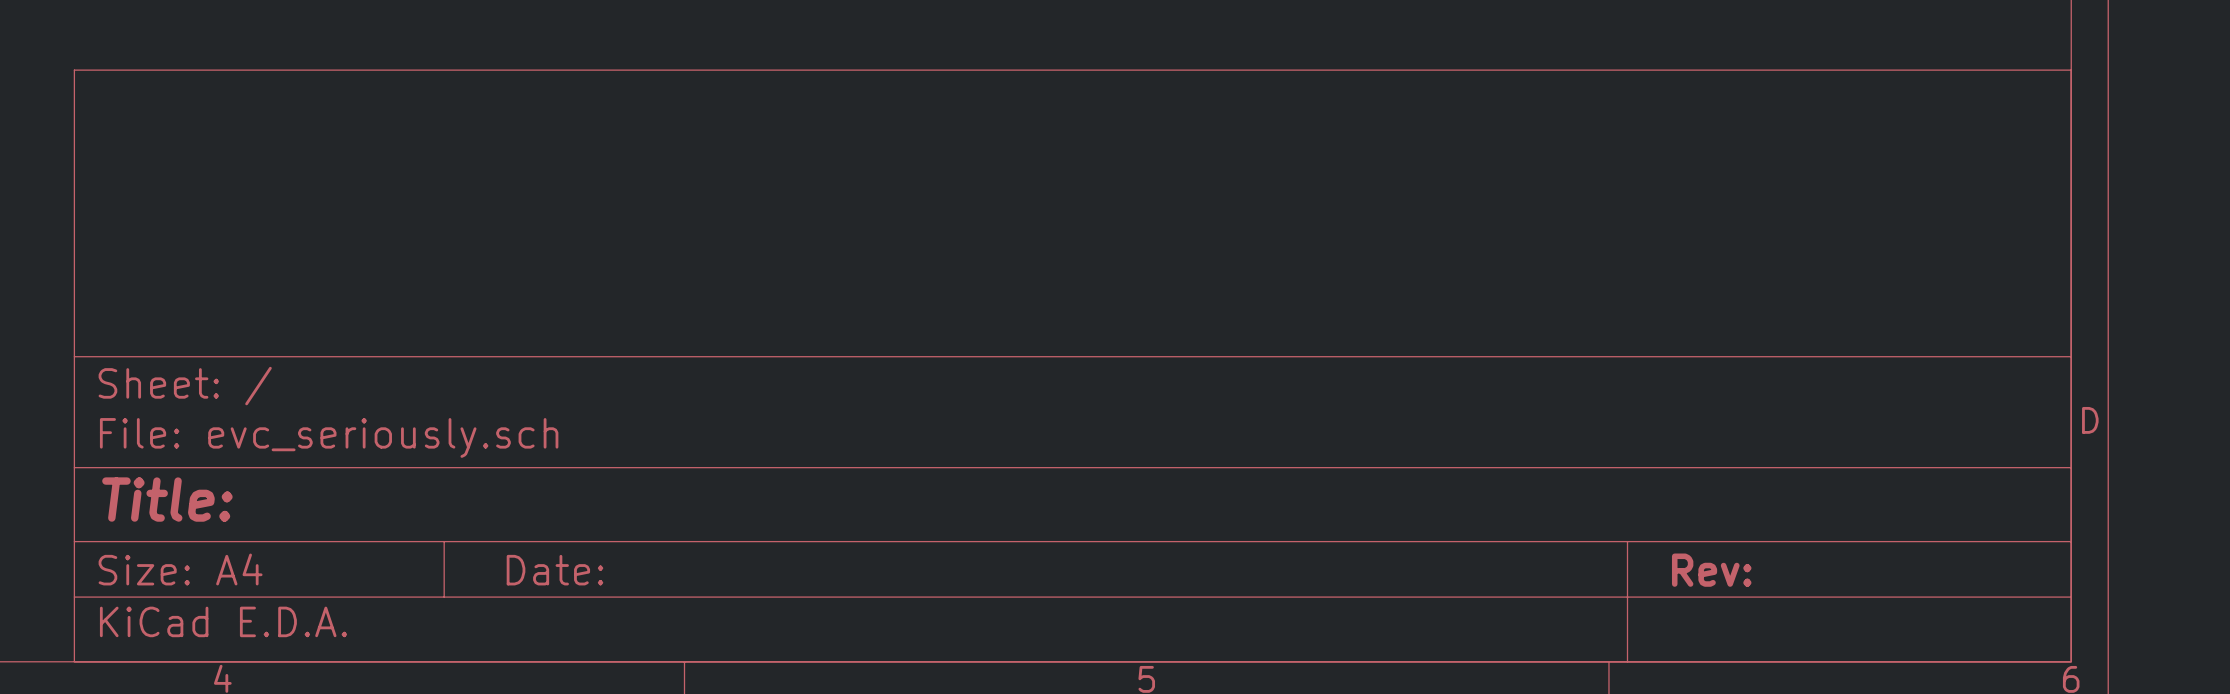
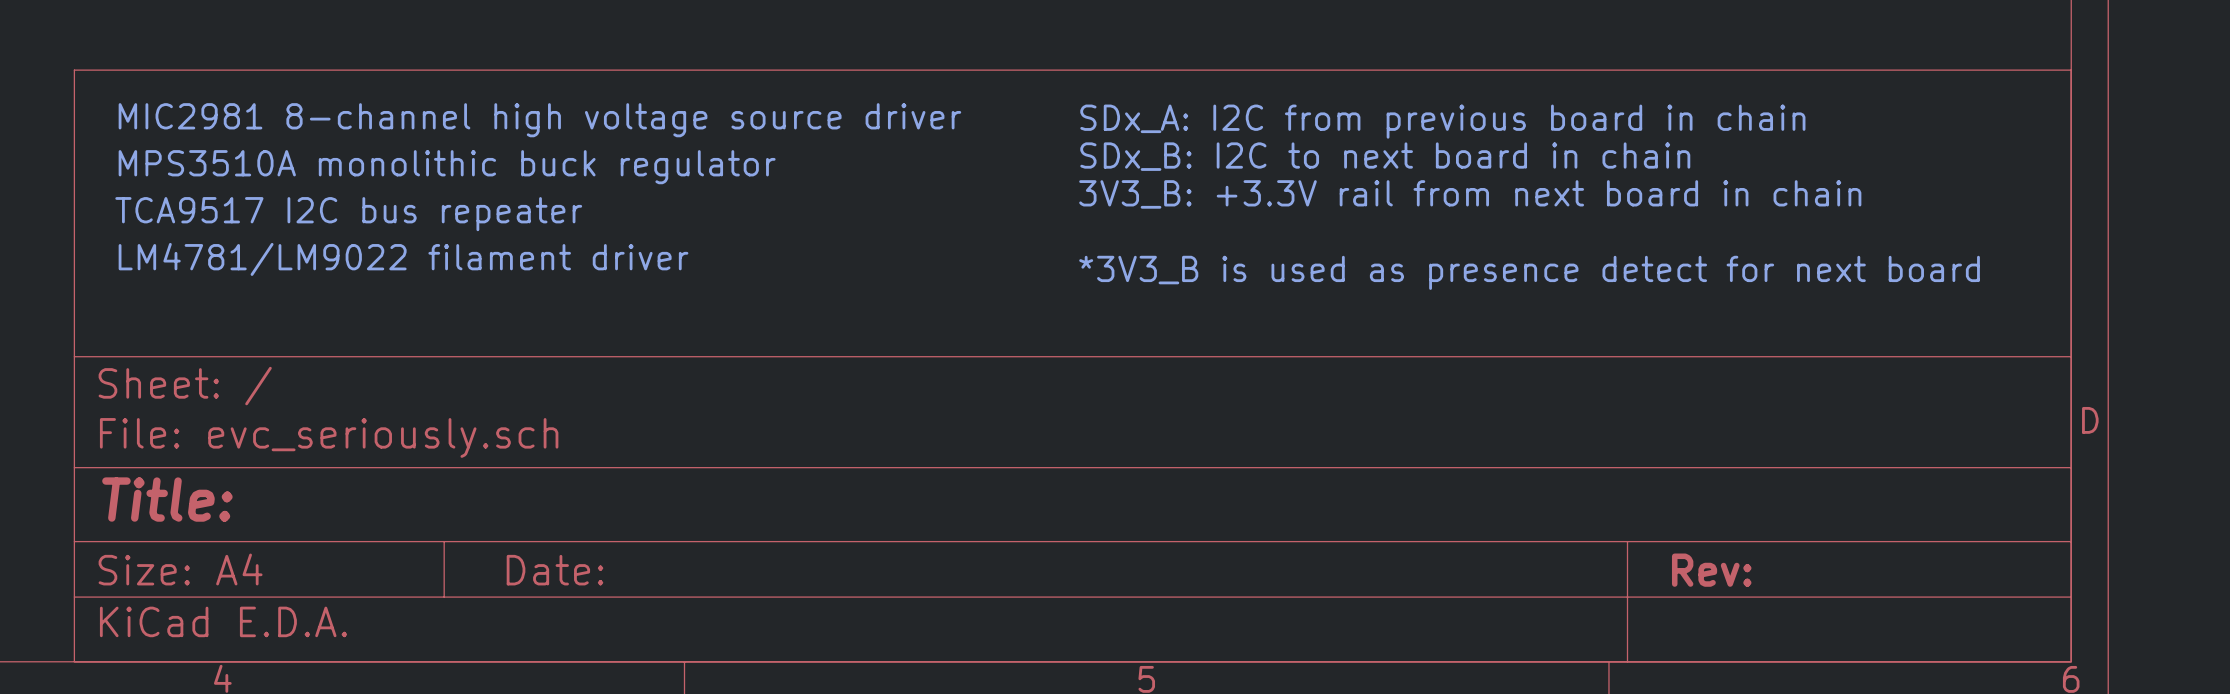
text: none -> MIC2981 8-channel high voltage source driver (539, 120)
text: none -> SDx_A: I2C from previous board in chain (1442, 121)
text: none -> SDx_B: I2C to next board in chain (1385, 156)
text: none -> MPS3510A monolithic buck regulator (447, 167)
text: none -> 3V3_B: +3.3V rail from next board in chain (1470, 194)
text: none -> TCA9517 I2C bus repeater (348, 214)
text: none -> LM4781/LM9022 filament driver (403, 259)
text: none -> *3V3_B is used as presence detect for next board (1529, 272)

